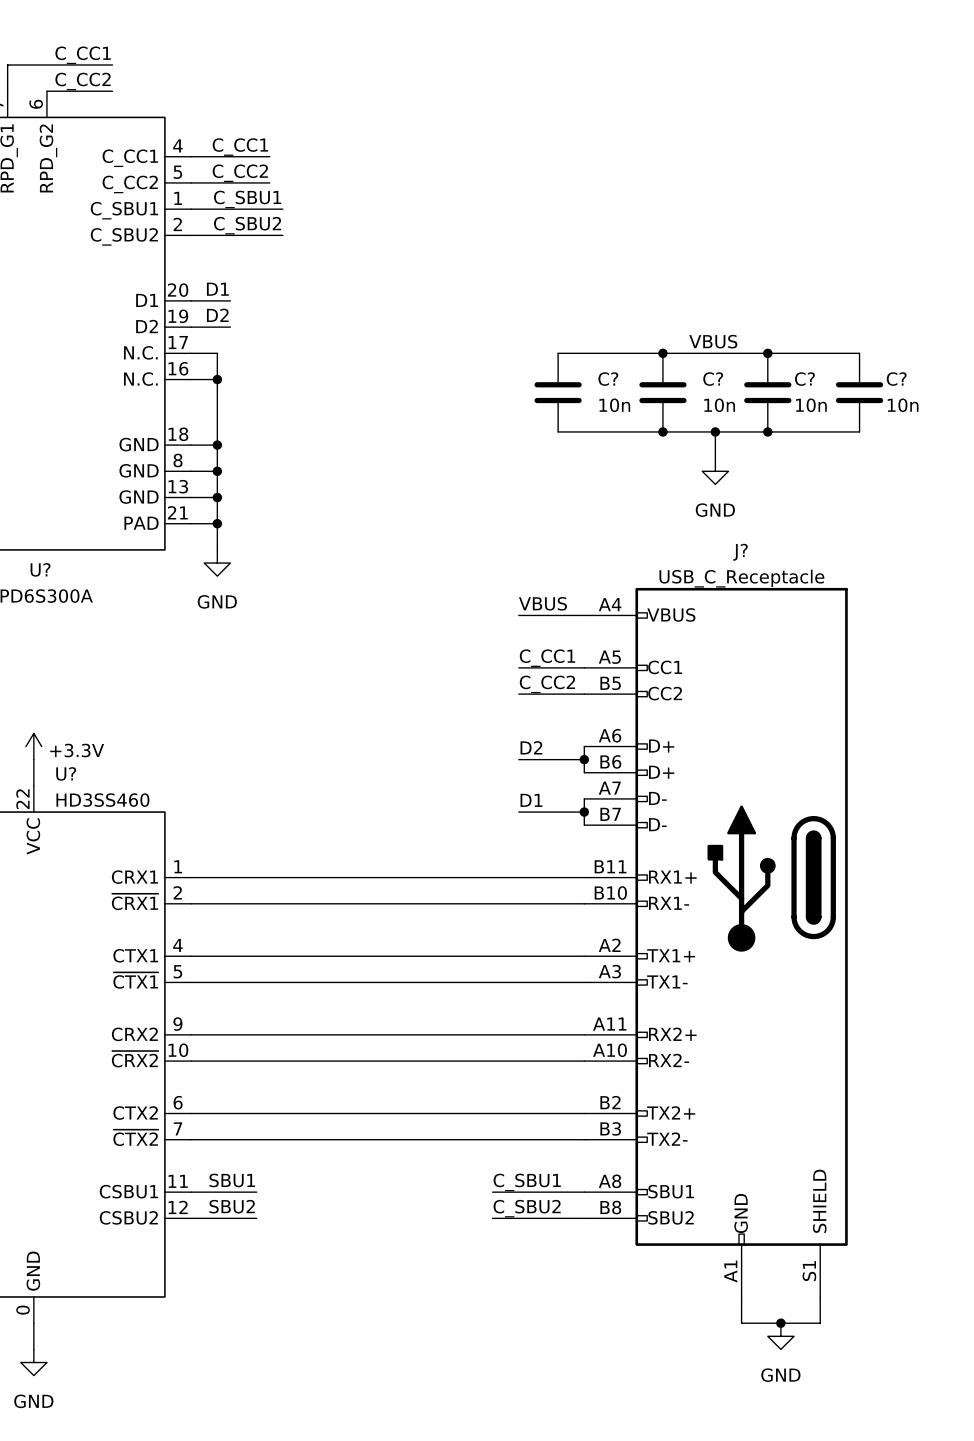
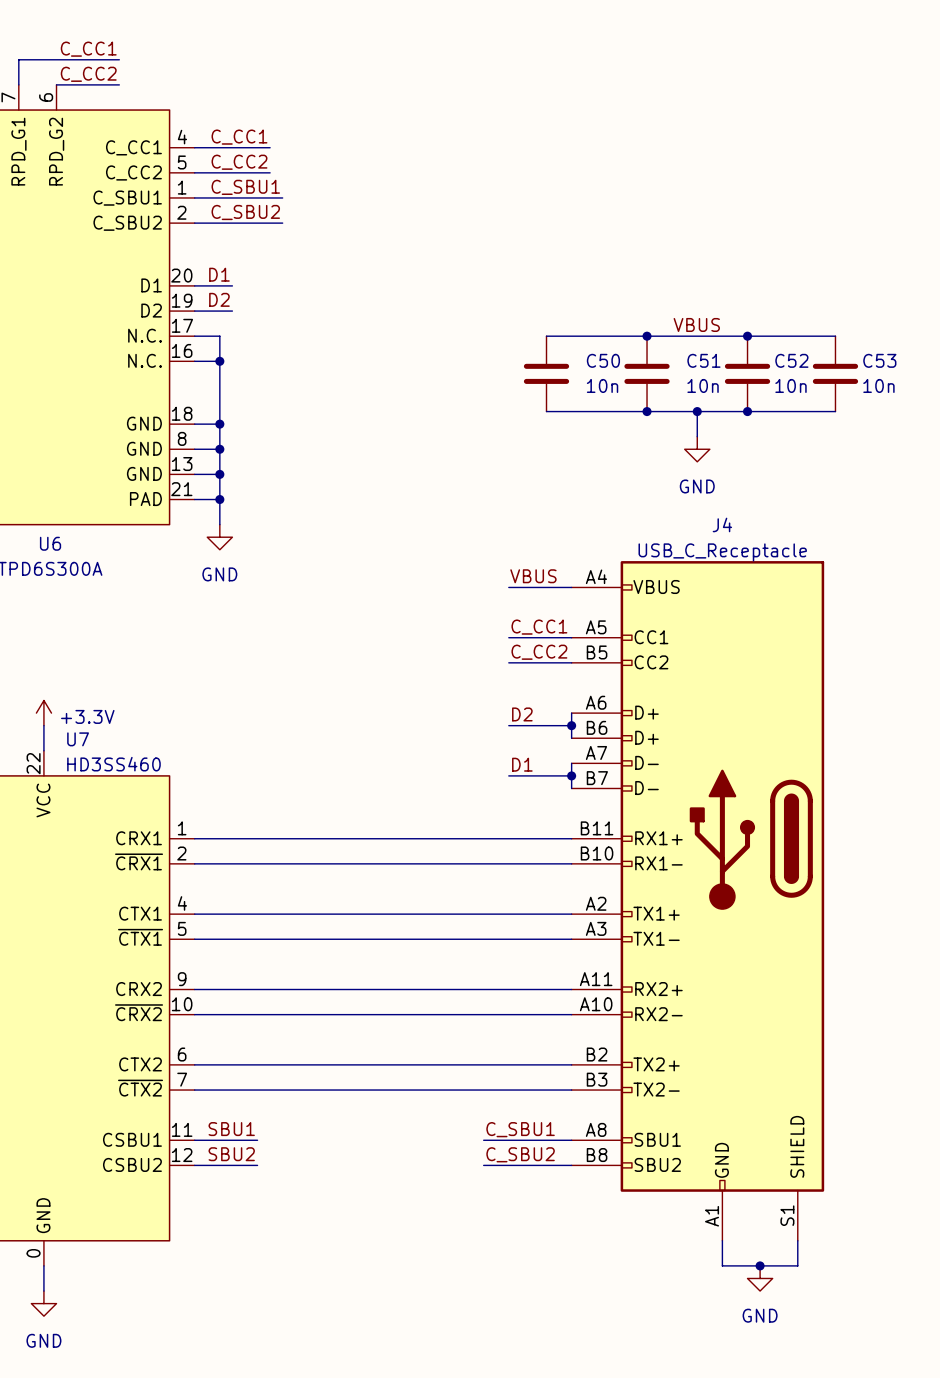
C? name: C? (608, 379) -> C50 (603, 360)
C? name: C? (713, 379) -> C51 (703, 360)
C? name: C? (804, 379) -> C52 (791, 360)
C? name: C? (896, 379) -> C53 (879, 360)
J? name: J? (740, 552) -> J4 (722, 524)
U? name: U? (40, 569) -> U6 (50, 543)
U? name: U? (66, 773) -> U7 (78, 739)

